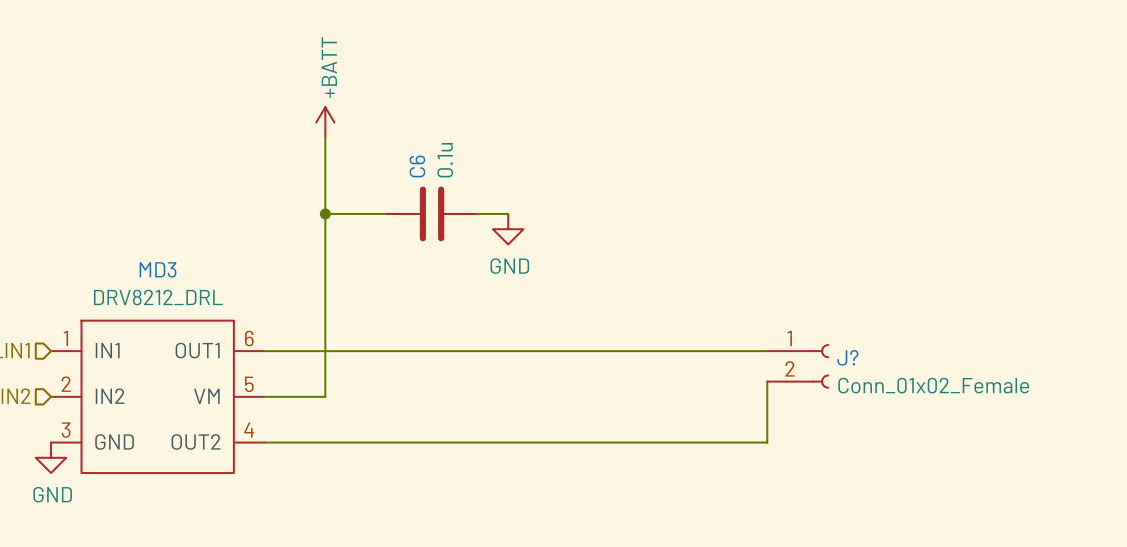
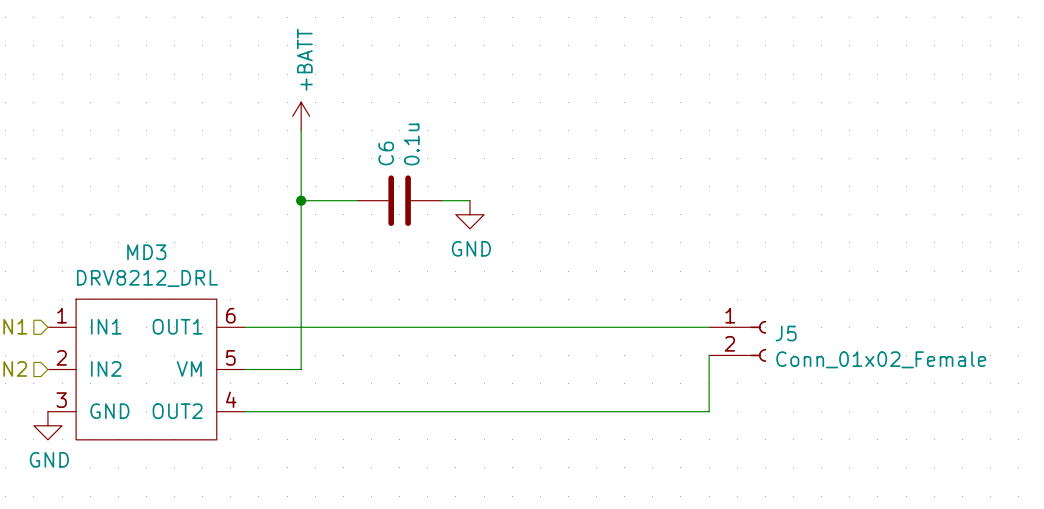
J? name: J? (847, 357) -> J5 (786, 333)

